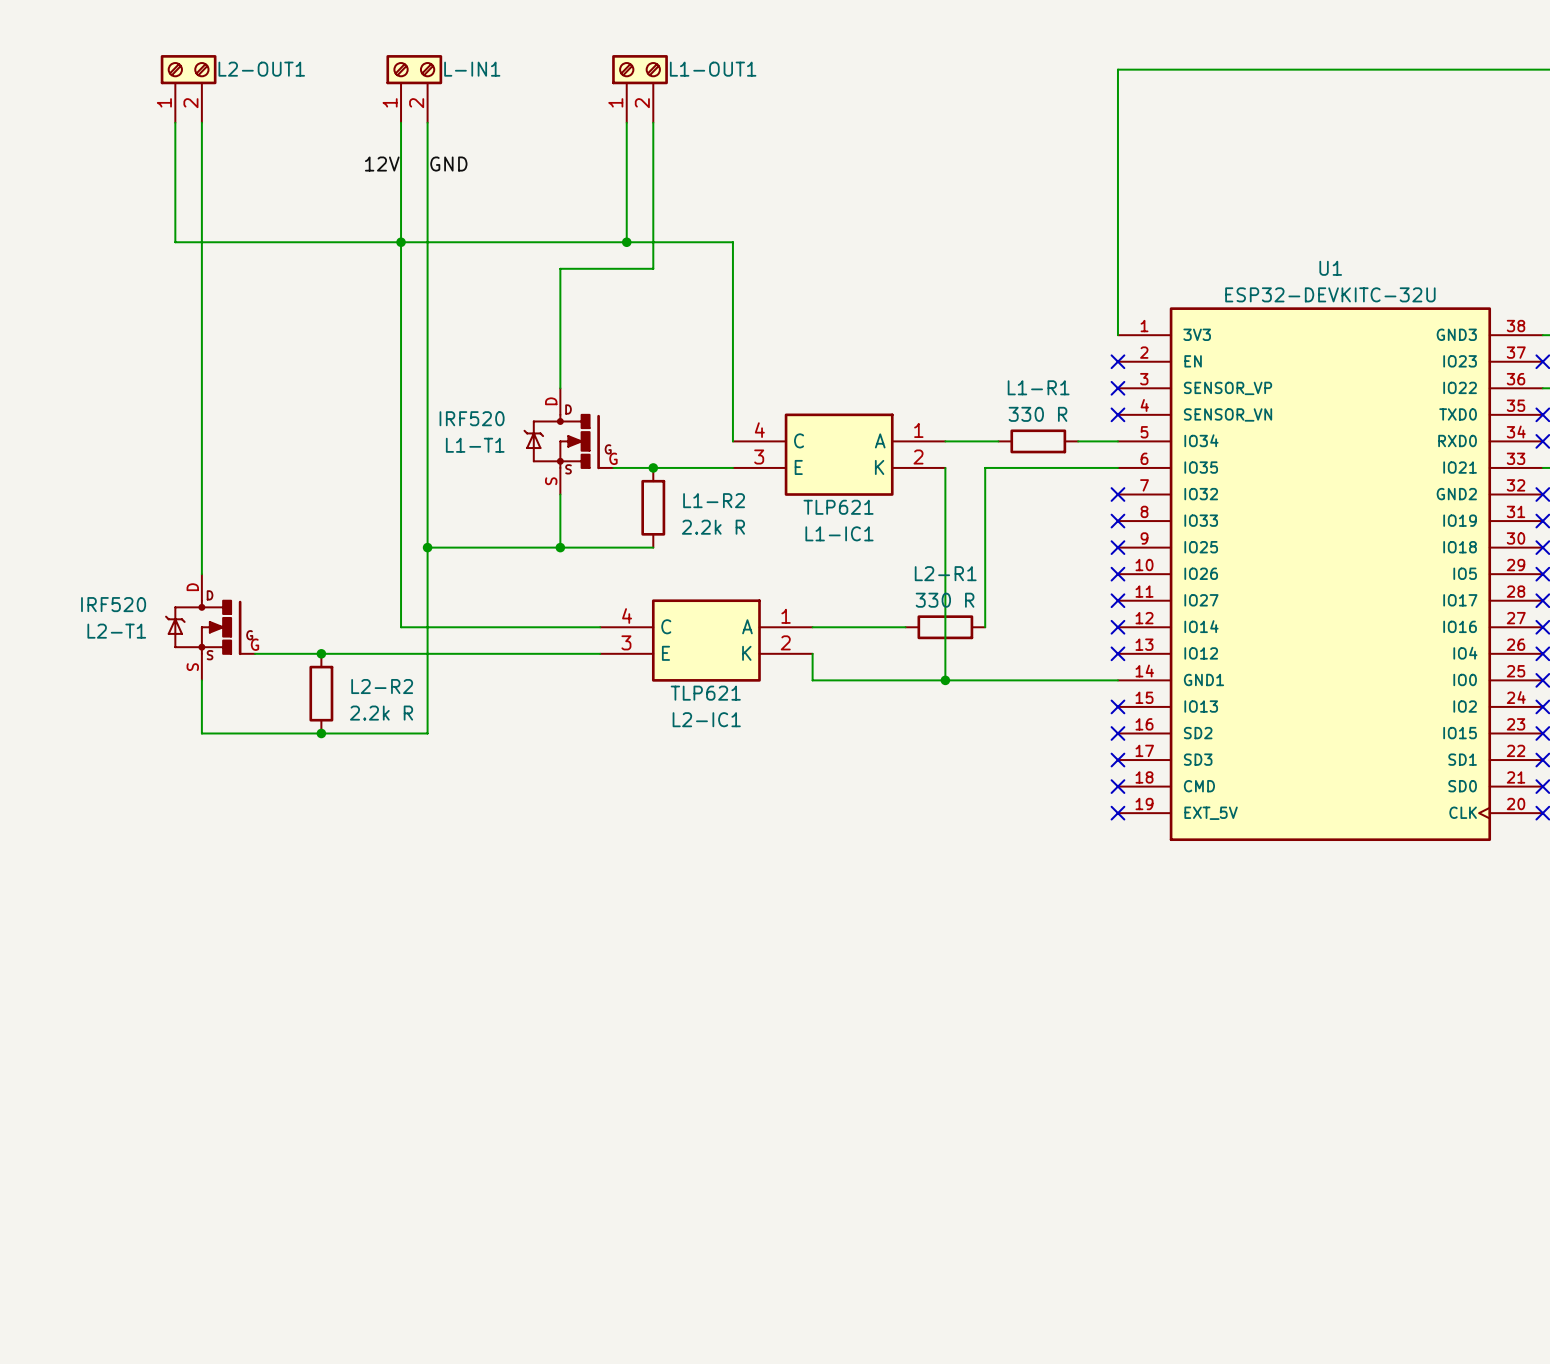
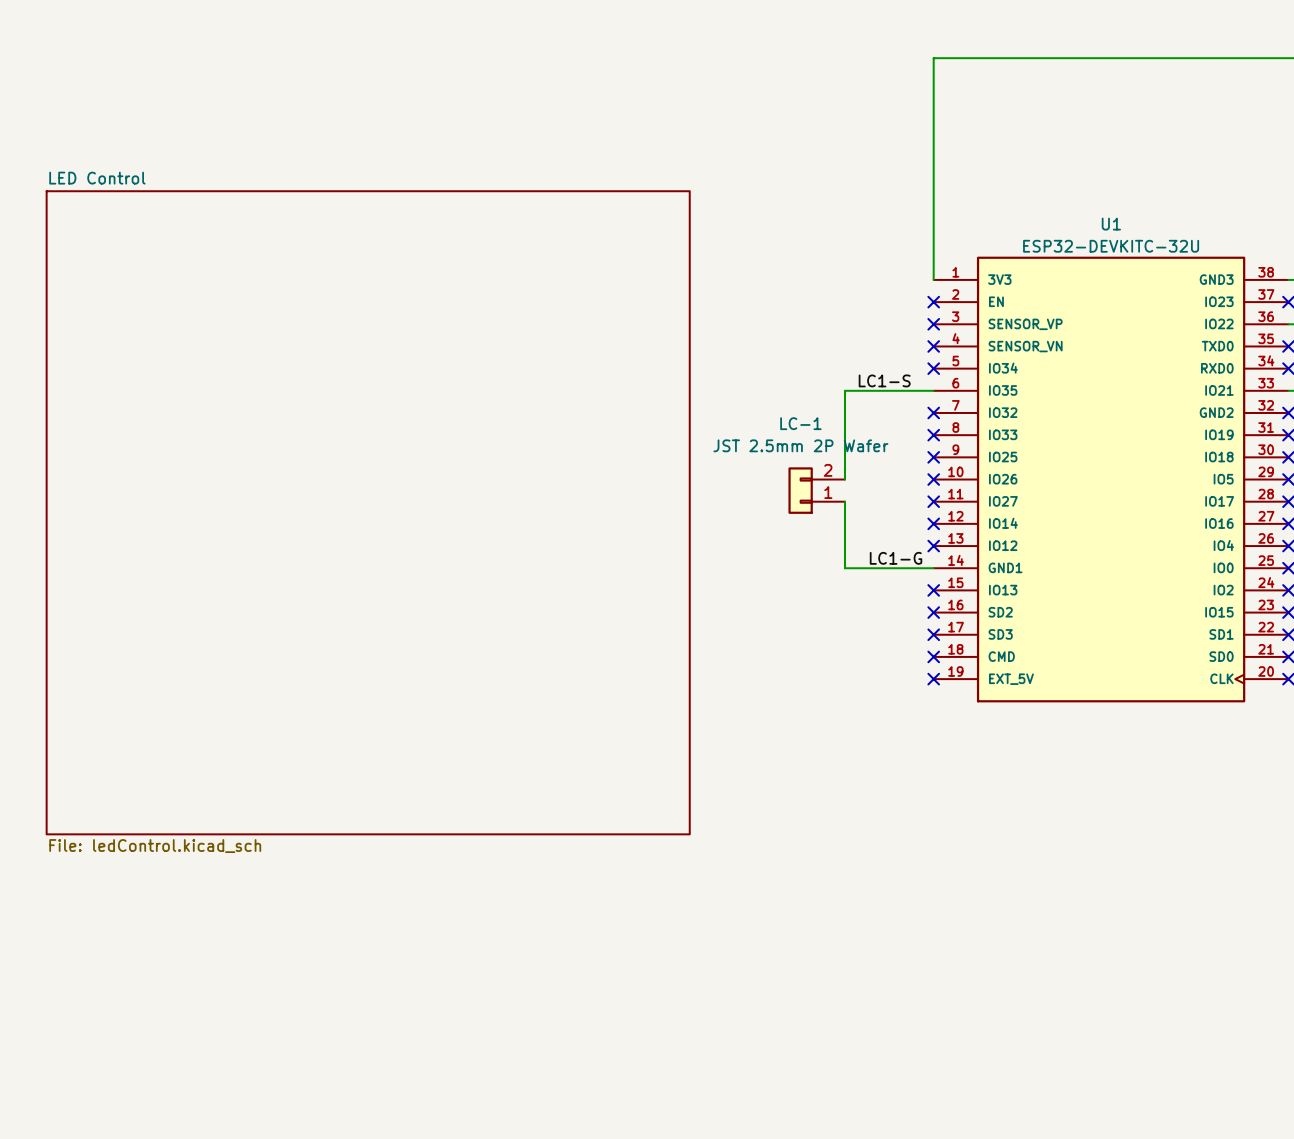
L2-OUT1: (188, 88) -> none
L-IN1: (414, 88) -> none
L1-OUT1: (640, 88) -> none
wire: (175, 122) (175, 242) (732, 242) (732, 441) -> none
wire: (201, 122) (201, 574) -> none
wire: (401, 122) (401, 627) (600, 627) -> none
wire: (427, 122) (427, 733) (201, 733) (201, 680) -> none
wire: (626, 122) (626, 242) -> none
wire: (653, 122) (653, 268) (560, 268) (560, 388) -> none
label: 12V (382, 164) -> none
label: GND (448, 164) -> none
junction: (401, 242) -> none
junction: (626, 242) -> none
L1-T1: IRF520 (568, 441) -> none
wire: (945, 441) (998, 441) -> none
L1-R1: 330 R (1038, 441) -> none
wire: (1078, 441) (1117, 441) -> none
no-connect mark: none -> (933, 368)
L1-IC1: TLP621 (839, 454) -> none
label: none -> LC1-S (884, 380)
wire: (613, 467) (732, 467) -> none
junction: (653, 467) -> none
wire: (945, 467) (945, 680) -> none
wire: (1011, 467) (985, 467) (985, 627) -> (844, 390) (844, 479)
wire: (560, 494) (560, 547) -> none
L1-R2: 2.2k R (653, 507) -> none
wire: (427, 547) (653, 547) -> none
junction: (427, 547) -> none
junction: (560, 547) -> none
LC-1: none -> JST 2.5mm 2P Wafer (816, 490)
sheet LED Control: none -> File: ledControl.kicad_sch (368, 512)
L2-T1: IRF520 (210, 627) -> none
wire: (812, 627) (905, 627) -> none
L2-R1: 330 R (945, 627) -> none
L2-IC1: TLP621 (706, 640) -> none
wire: (254, 653) (600, 653) -> none
junction: (321, 653) -> none
wire: (812, 653) (812, 680) (1011, 680) -> (844, 501) (844, 568)
label: none -> LC1-G (896, 558)
junction: (945, 680) -> none
L2-R2: 2.2k R (321, 693) -> none
junction: (321, 733) -> none

